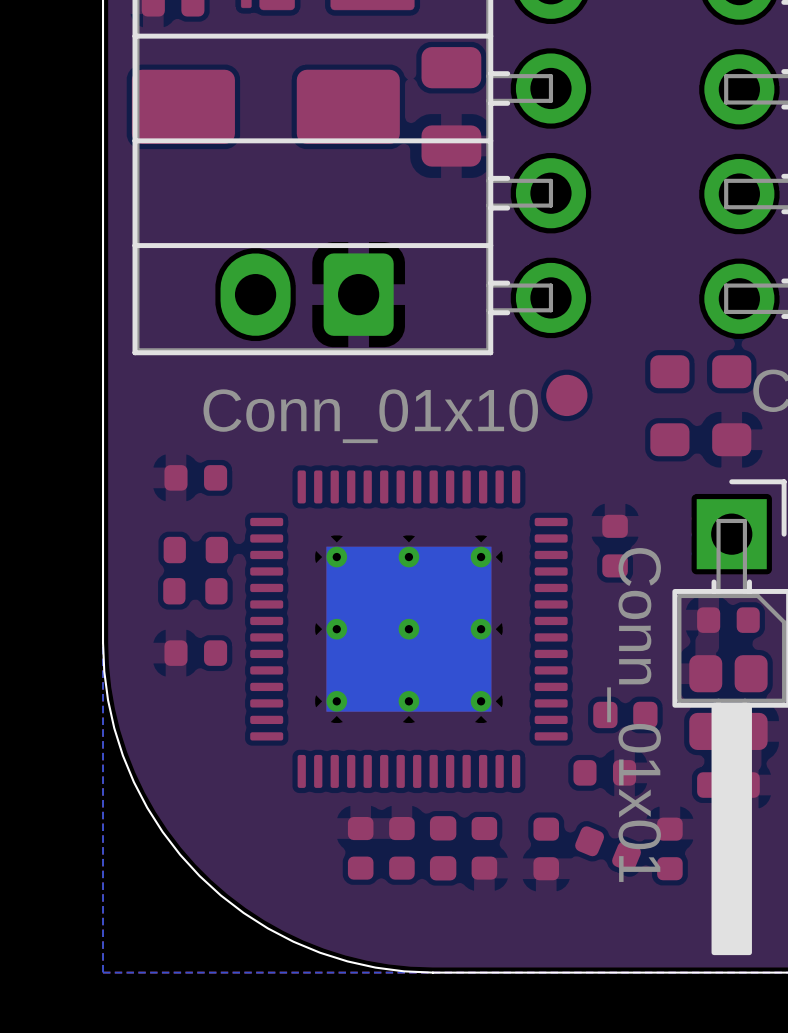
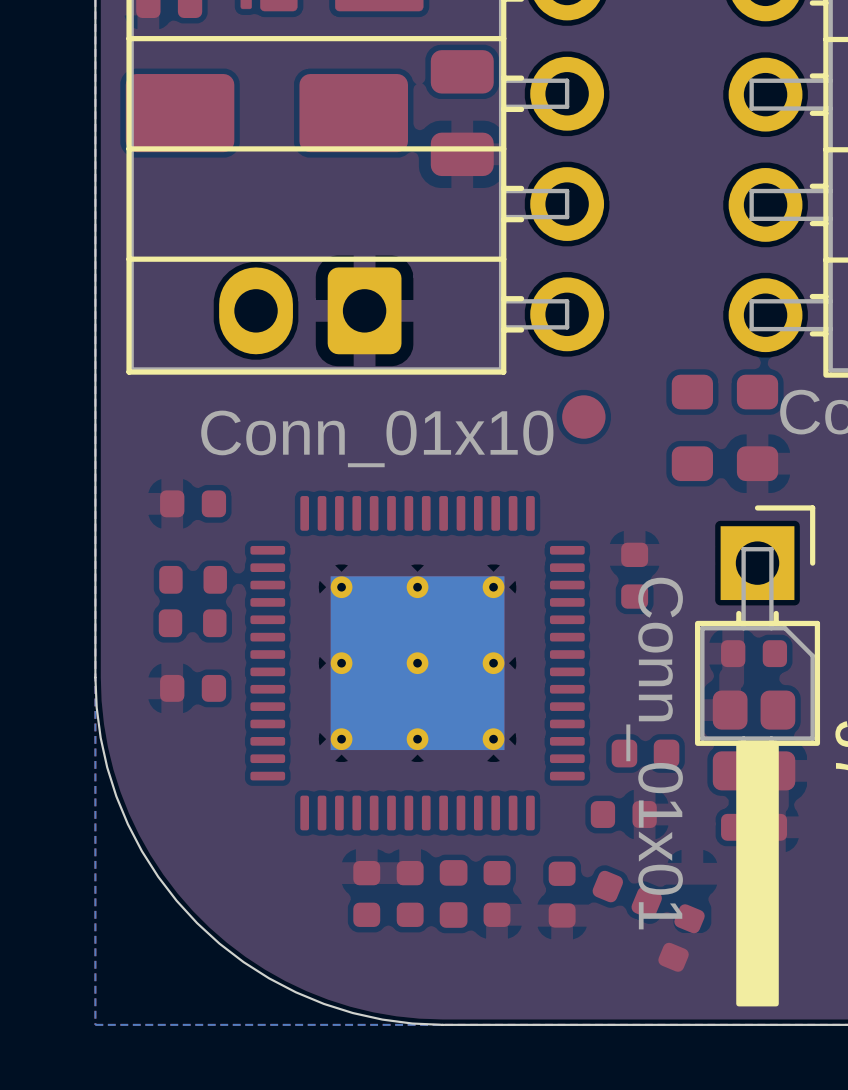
part: (669, 848) -> none
part: none -> (681, 938)

